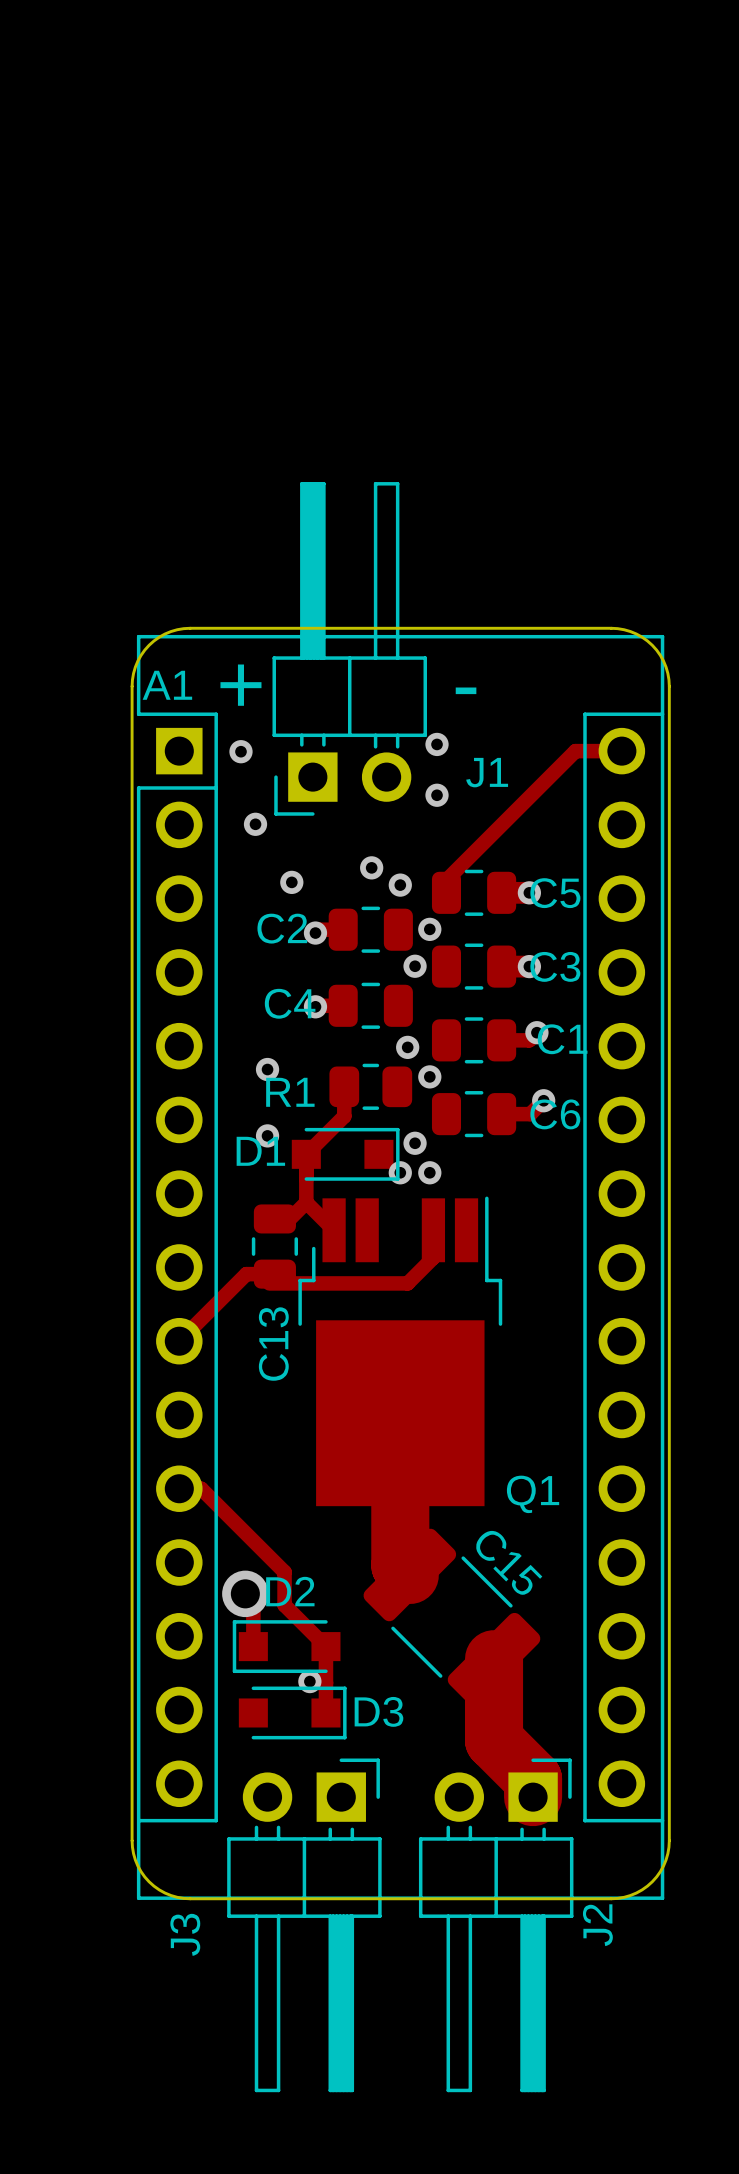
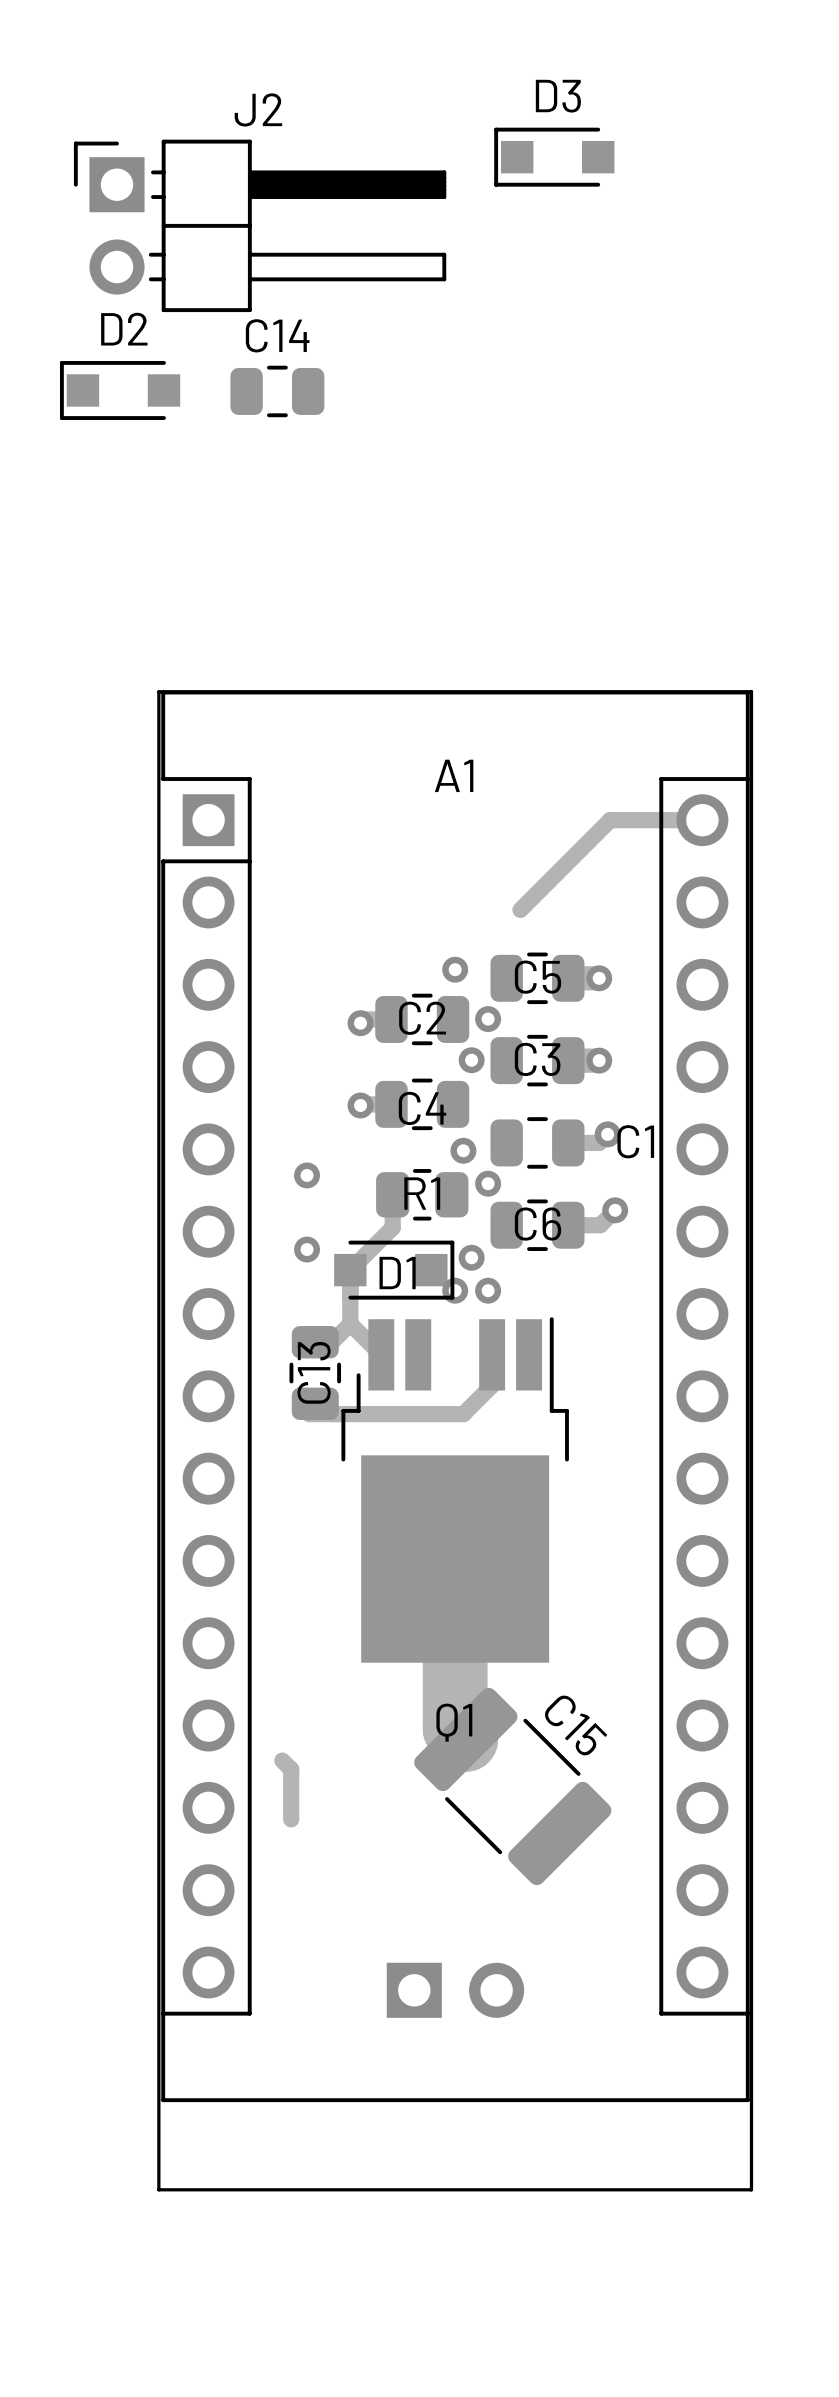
C14: none -> (277, 391)
board edge: (190, 628) (617, 628) (636, 634) (647, 640) (656, 650) (666, 667) (669, 686) (669, 1840) (666, 1859) (656, 1876) (642, 1889) (630, 1895) (611, 1898) (183, 1898) (170, 1895) (153, 1886) (144, 1876) (135, 1859) (132, 1840) (132, 686) (137, 661) (149, 645) (164, 634) (190, 628) -> (158, 691) (158, 2189) (751, 2189) (751, 691) (158, 691)
J1: (349, 648) -> none
A1 name position: A1 (167, 685) -> A1 (454, 775)
text: + (240, 685) -> none
text: - (466, 690) -> none
via: (437, 744) -> none
via: (240, 751) -> none
track: (575, 751) (446, 880) (446, 892) -> (650, 820) (610, 820) (520, 909)
via: (437, 795) -> none
via: (255, 824) -> none
via: (371, 867) -> none
via: (291, 882) -> none
C5 name position: C5 (555, 893) -> C5 (538, 977)
C2 name position: C2 (282, 928) -> C2 (422, 1018)
C3 name position: C3 (555, 966) -> C3 (537, 1059)
C4 name position: C4 (290, 1003) -> C4 (422, 1108)
R1 name position: R1 (290, 1092) -> R1 (422, 1193)
C6 name position: C6 (555, 1114) -> C6 (538, 1224)
D1 name position: D1 (260, 1151) -> D1 (397, 1273)
track: (274, 1274) (246, 1274) (179, 1341) -> none
C13 name position: C13 (273, 1344) -> C13 (314, 1372)
track: (179, 1488) (201, 1488) (284, 1572) (284, 1605) (325, 1646) (325, 1712) -> none
Q1 name position: Q1 (533, 1494) -> Q1 (454, 1722)
via: (245, 1593) -> none
D2 position: (286, 1646) -> (120, 390)
track: (494, 1659) (494, 1740) (533, 1779) (533, 1797) -> none
via: (309, 1681) -> none
D3 name position: D3 (378, 1711) -> D3 (558, 96)
D3 rotation: 0° (292, 1712) -> 180° (554, 157)
D3 position: (292, 1712) -> (554, 157)
part: none -> (455, 1990)
J3: (304, 1925) -> none
J2 rotation: 0° (496, 1925) -> 90° counterclockwise (260, 225)
J2 position: (496, 1925) -> (260, 225)

